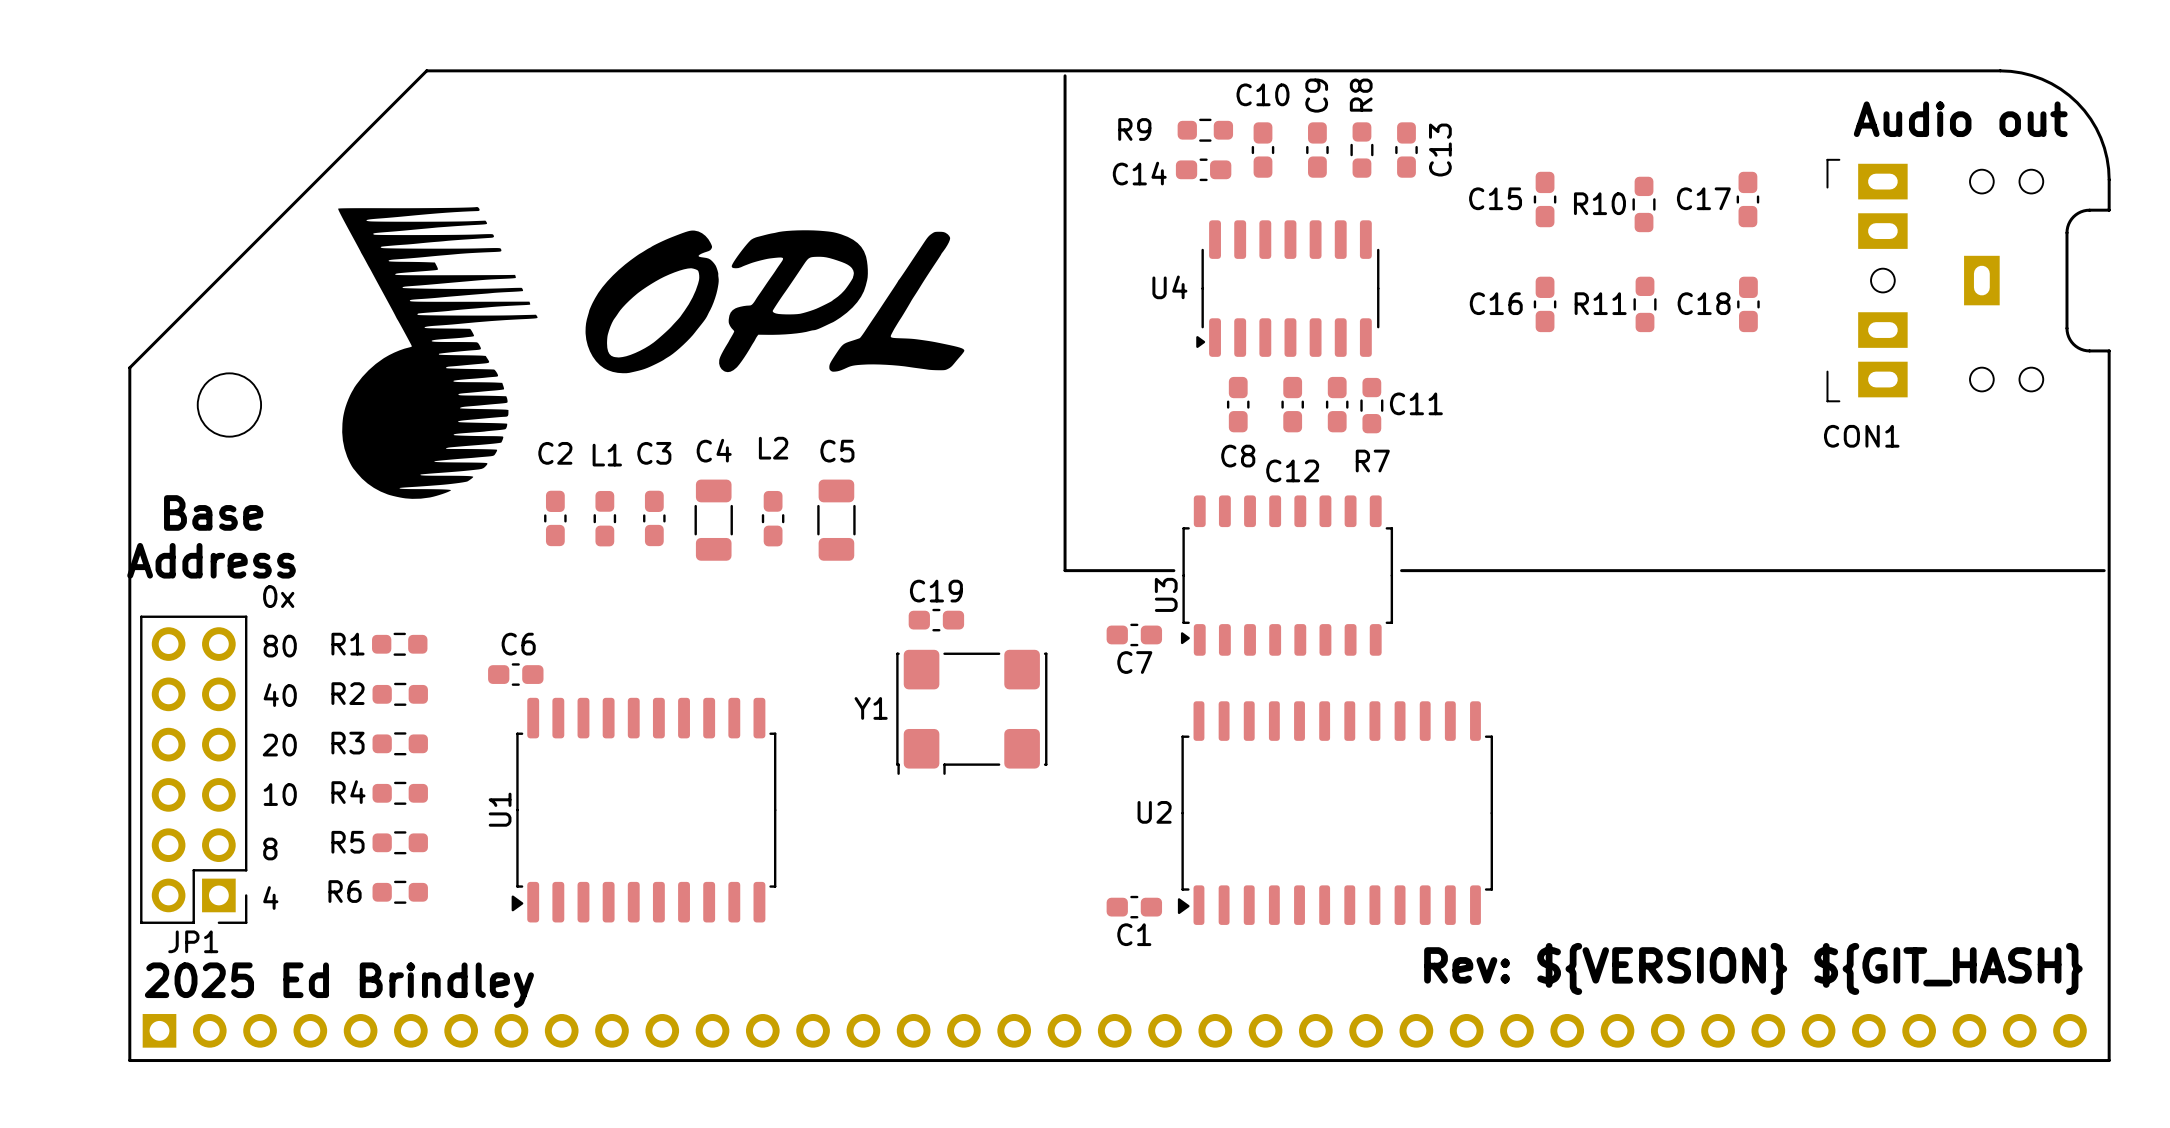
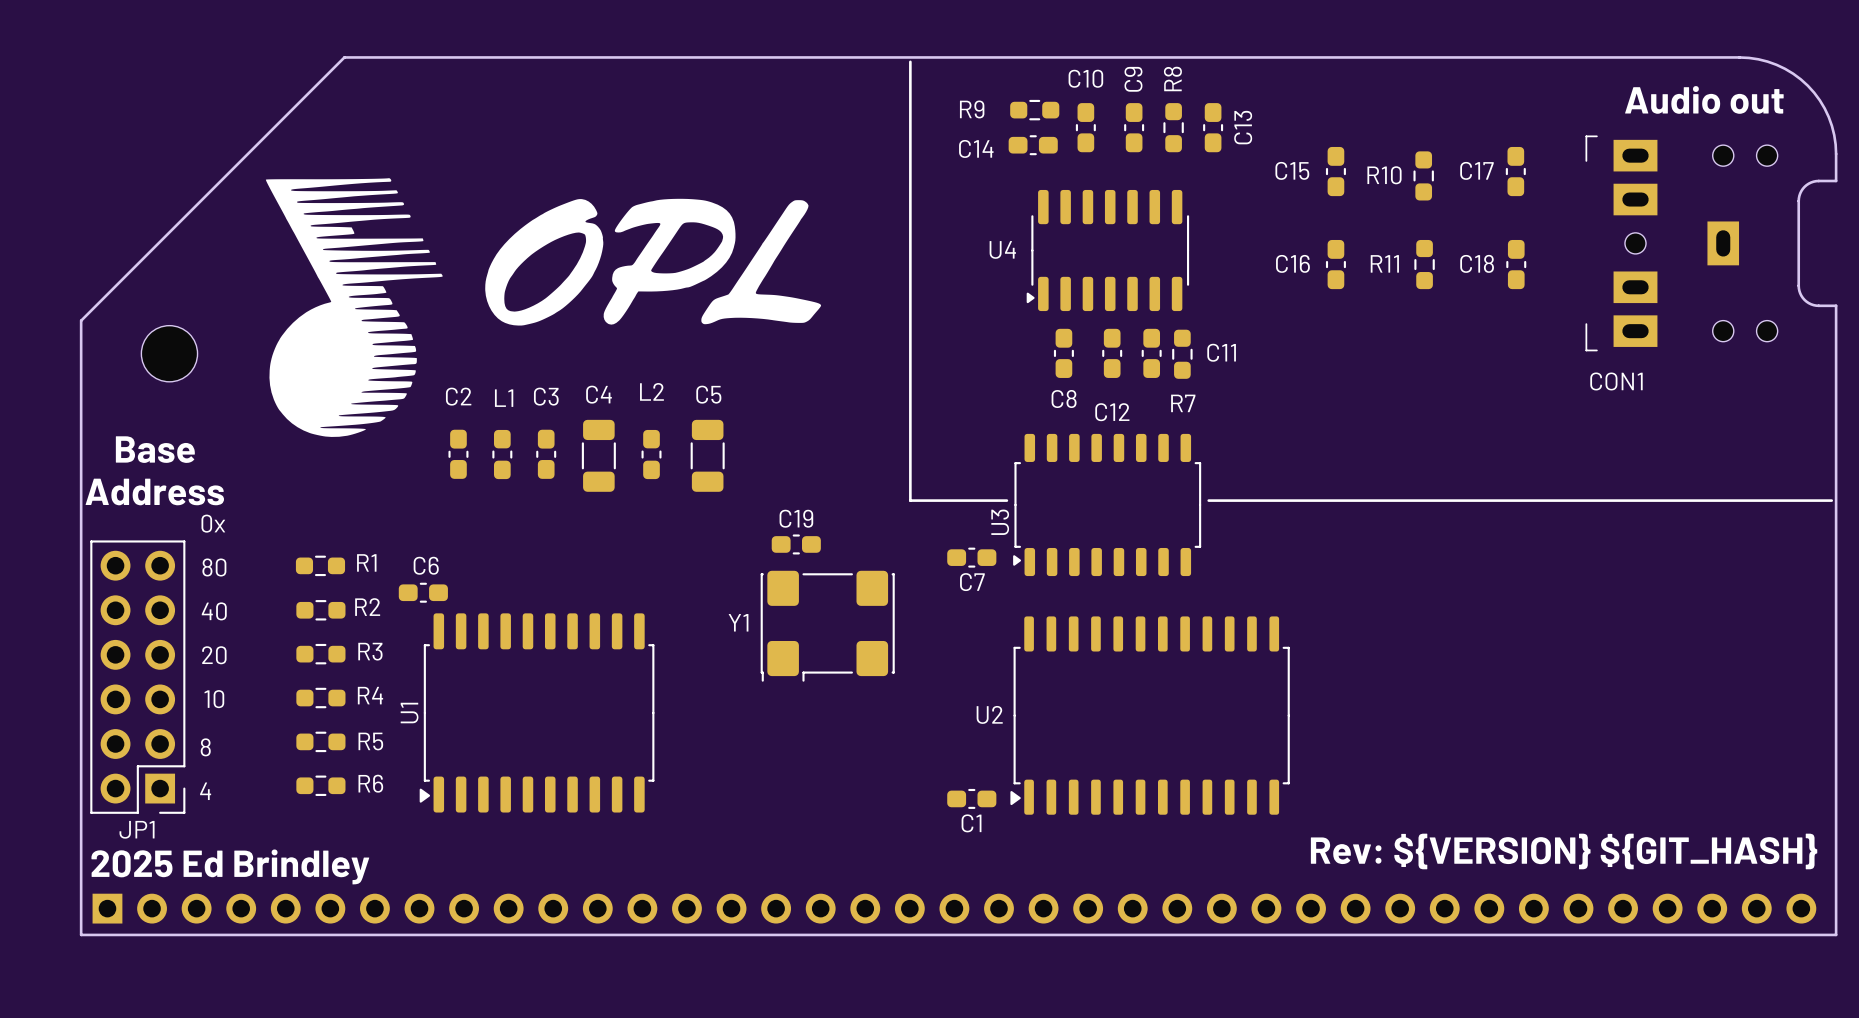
R1 name position: R1 (348, 644) -> R1 (366, 562)
R2 name position: R2 (348, 693) -> R2 (367, 607)
R3 name position: R3 (348, 743) -> R3 (370, 651)
R4 name position: R4 (348, 792) -> R4 (370, 695)
R5 name position: R5 (348, 842) -> R5 (370, 741)
R6 name position: R6 (345, 891) -> R6 (370, 783)

